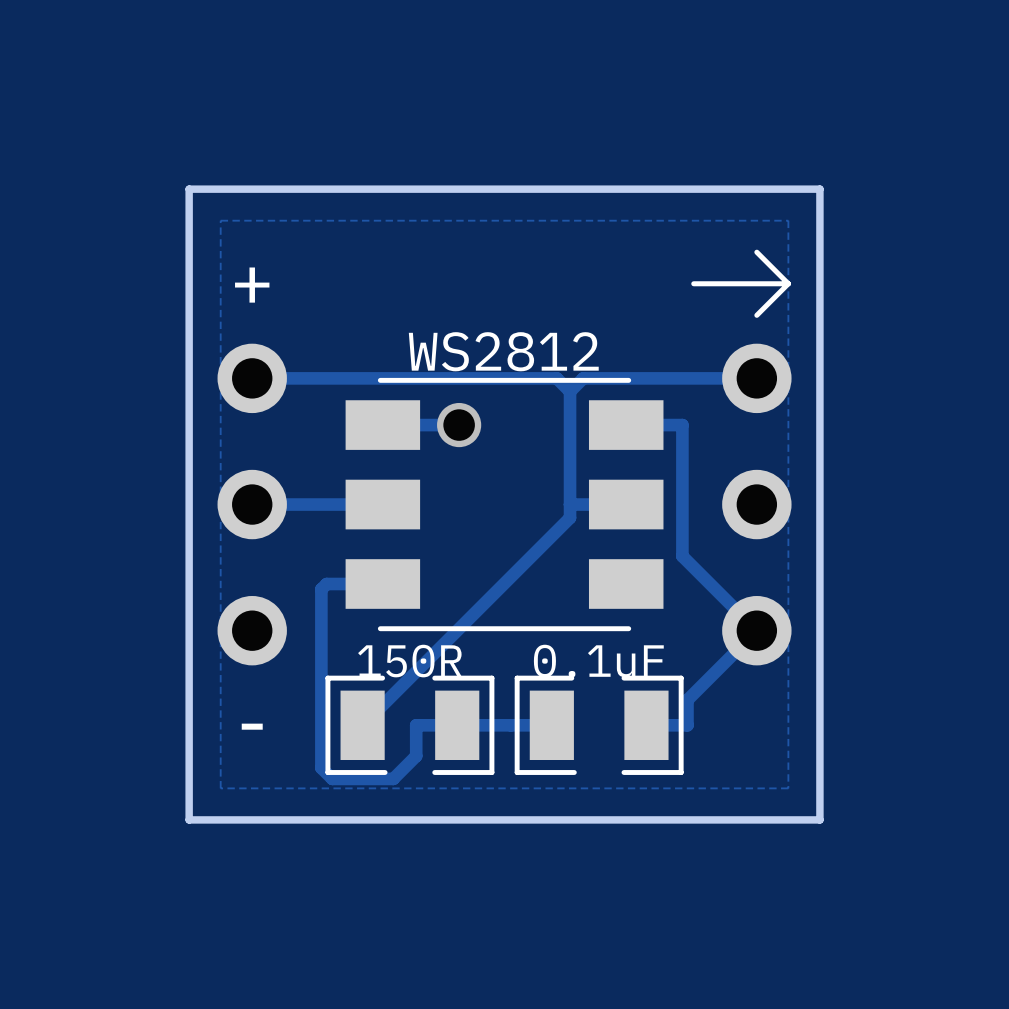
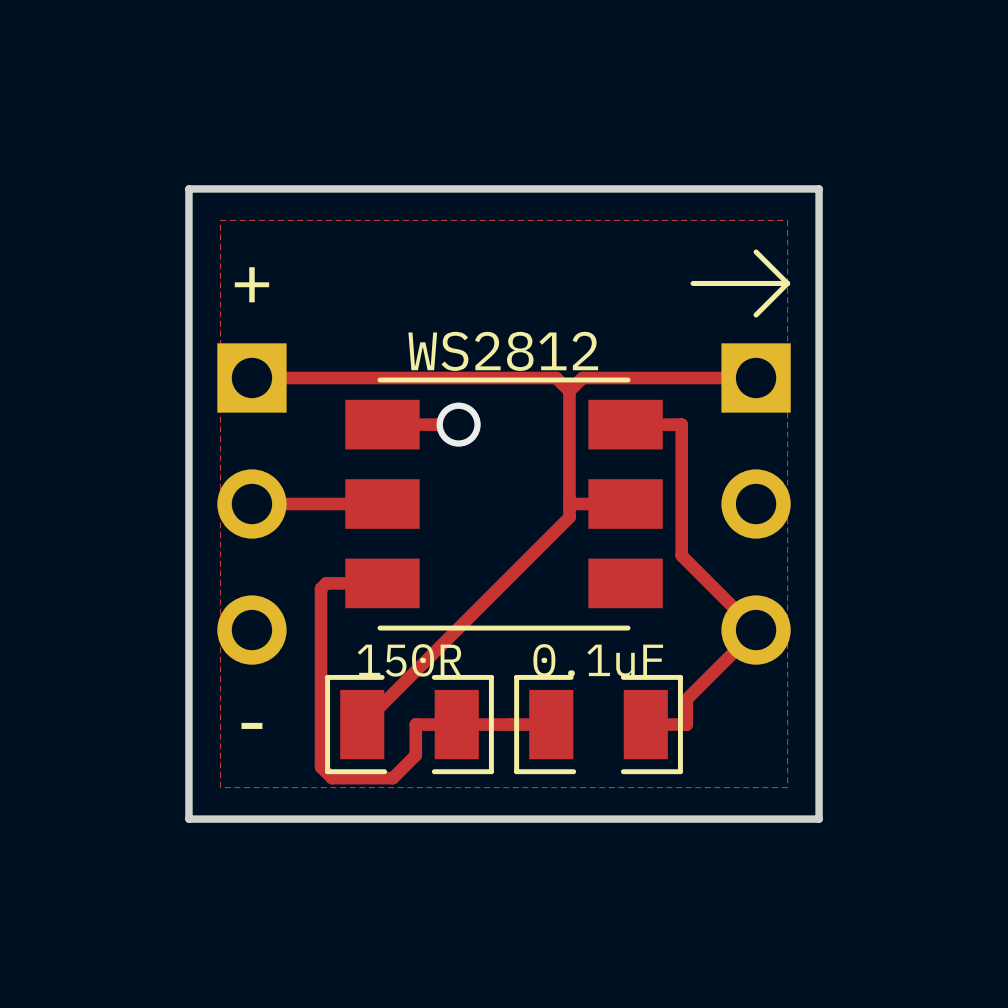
part footprint: [217, 343, 287, 666] -> [217, 343, 287, 665]
part footprint: [722, 343, 792, 666] -> [721, 343, 791, 665]

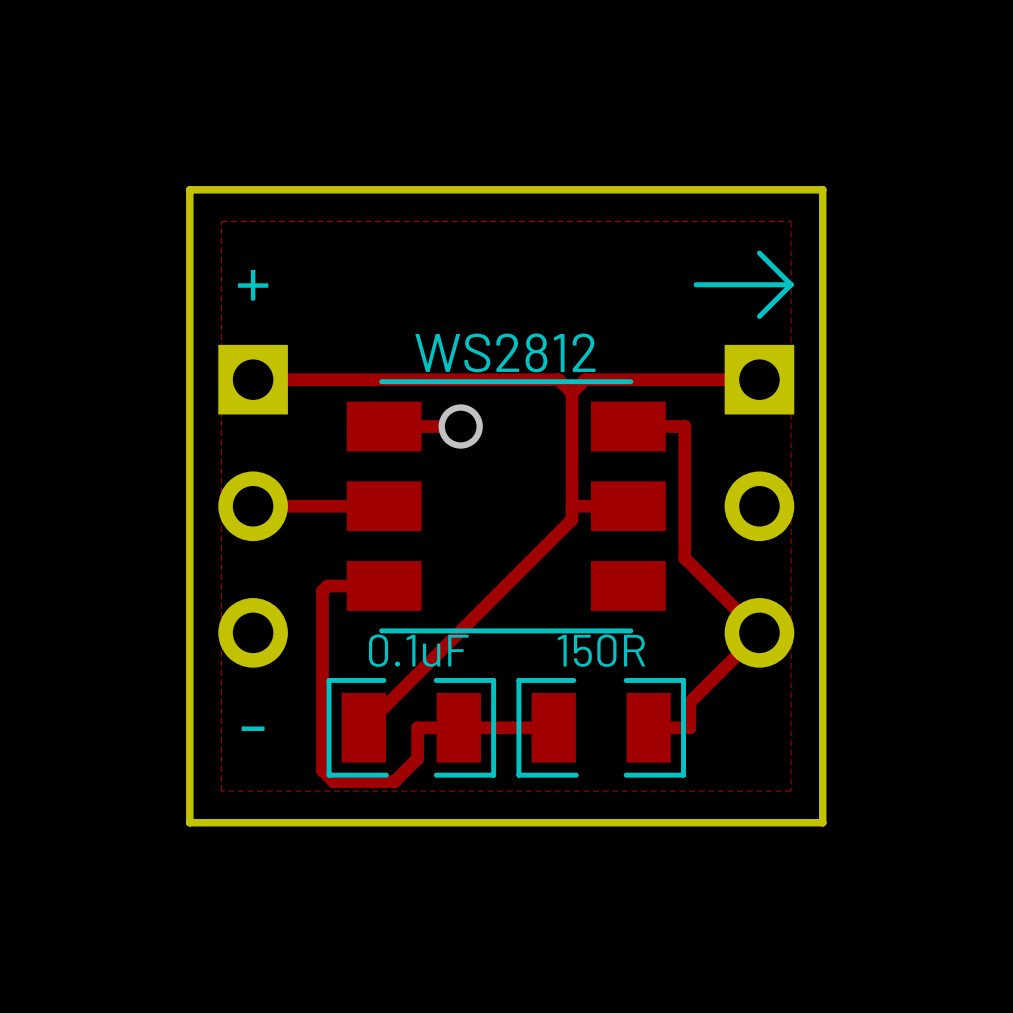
part value position: 150R (409, 660) -> 150R (601, 650)
part value position: 0.1uF (598, 660) -> 0.1uF (418, 650)

